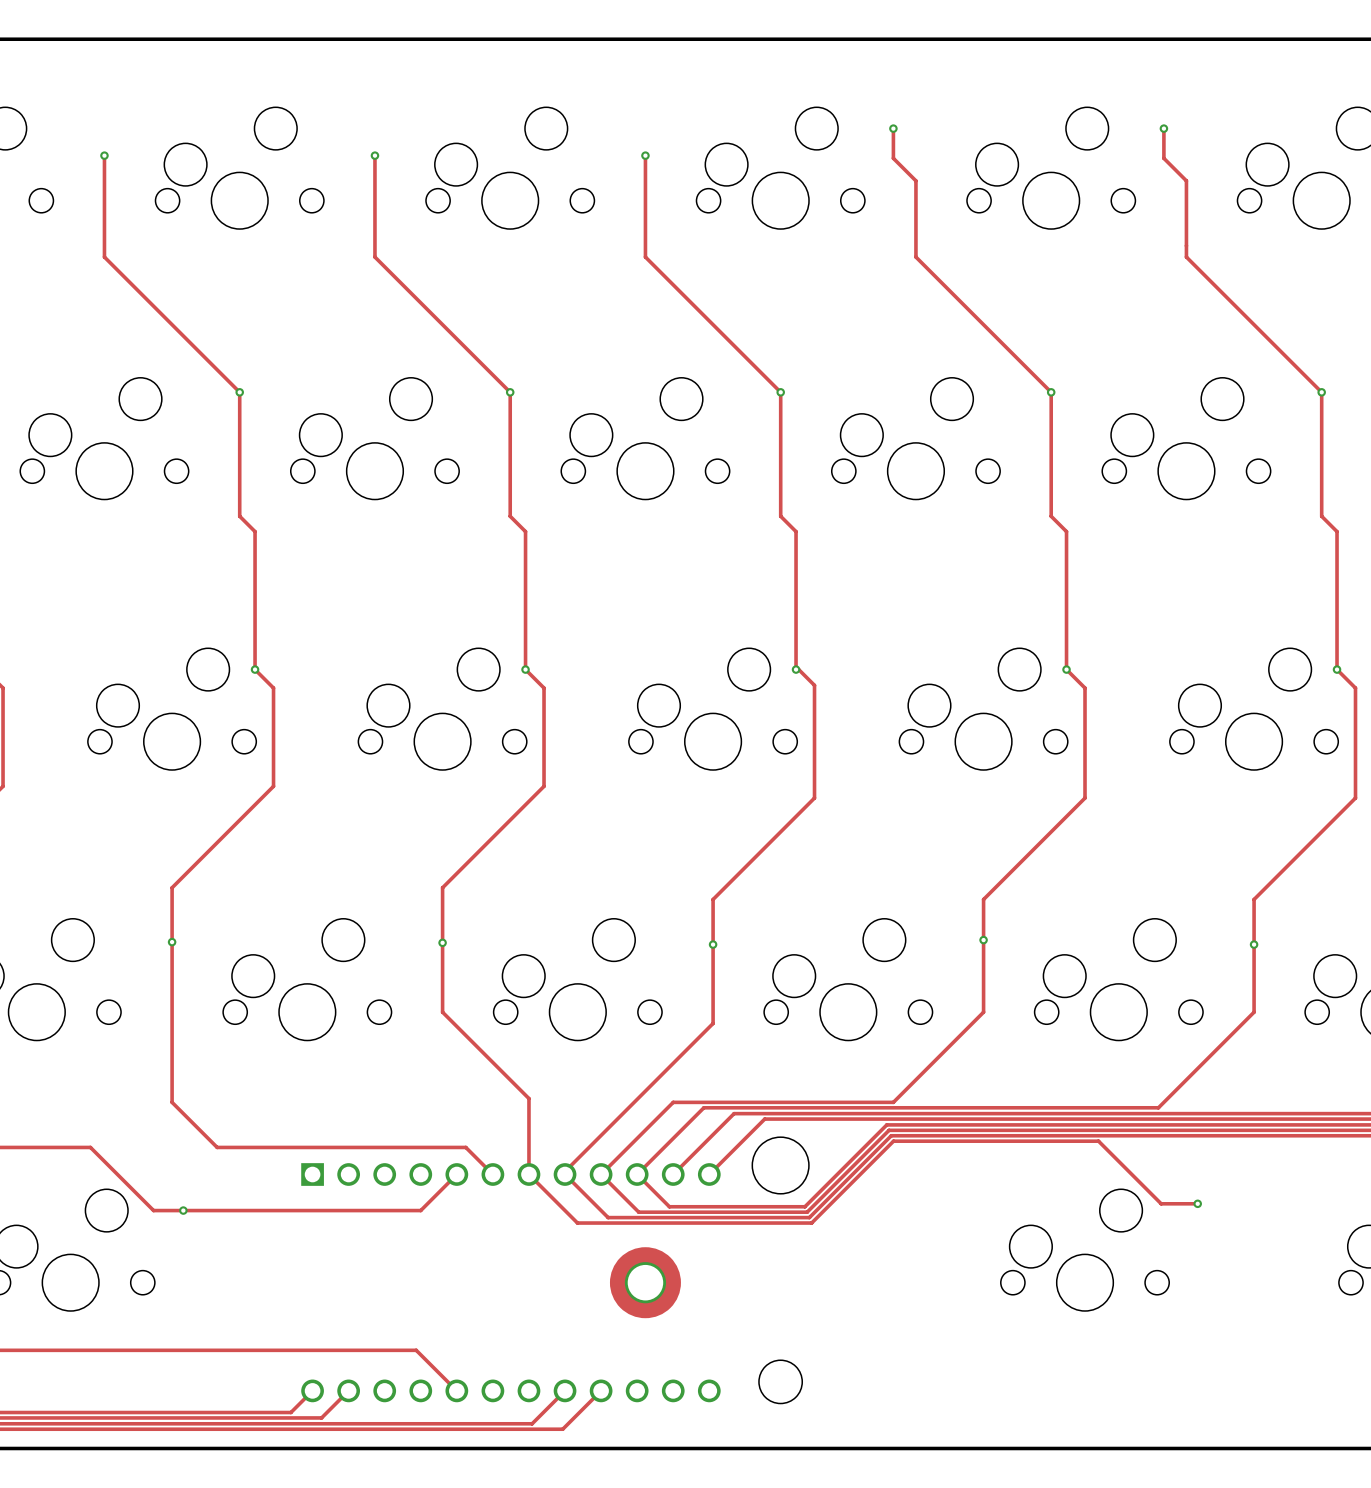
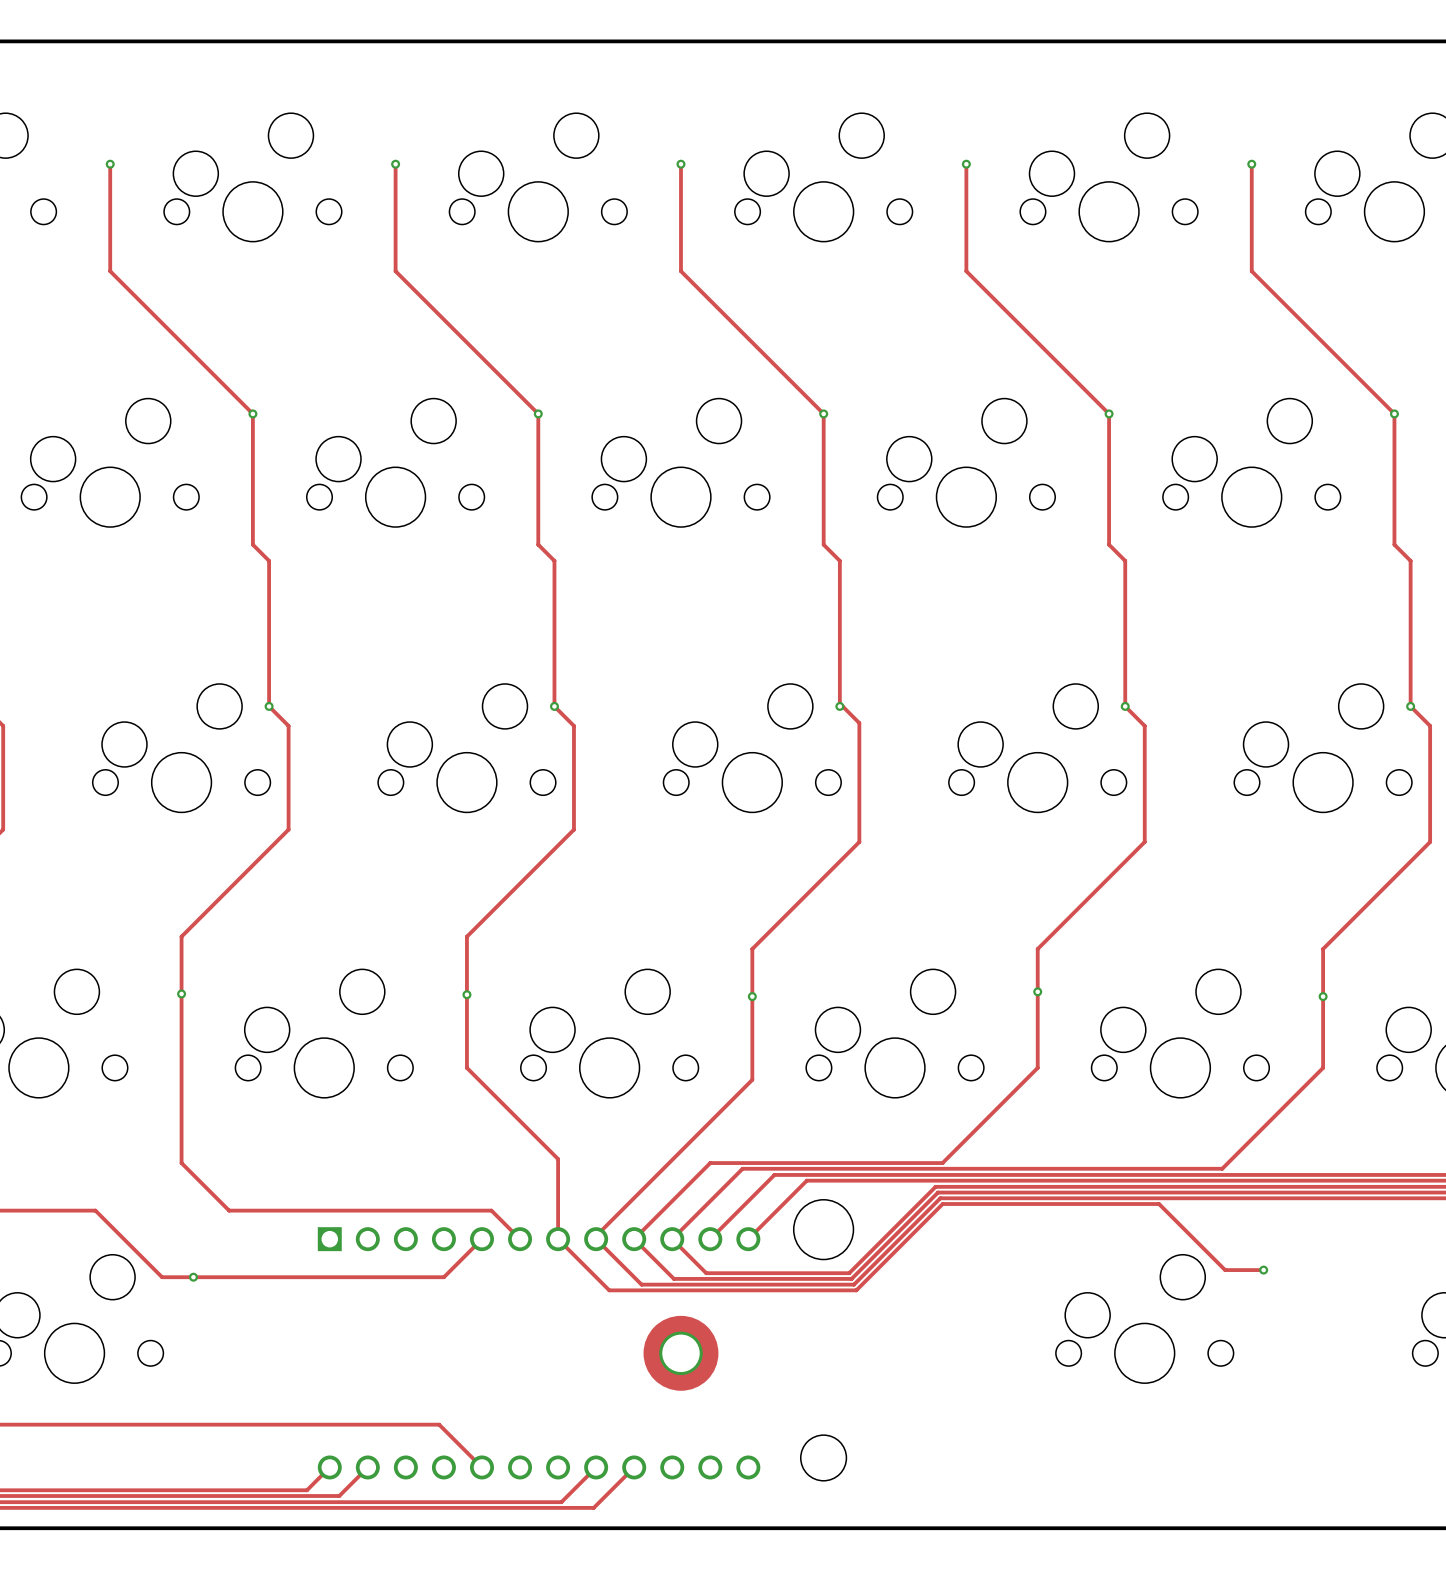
track: (893, 128) (893, 158) (915, 180) -> (966, 164) (966, 190)
via position: (893, 128) -> (966, 164)
track: (1163, 128) (1163, 158) (1186, 180) -> (1251, 164) (1251, 190)
via position: (1163, 128) -> (1251, 164)

